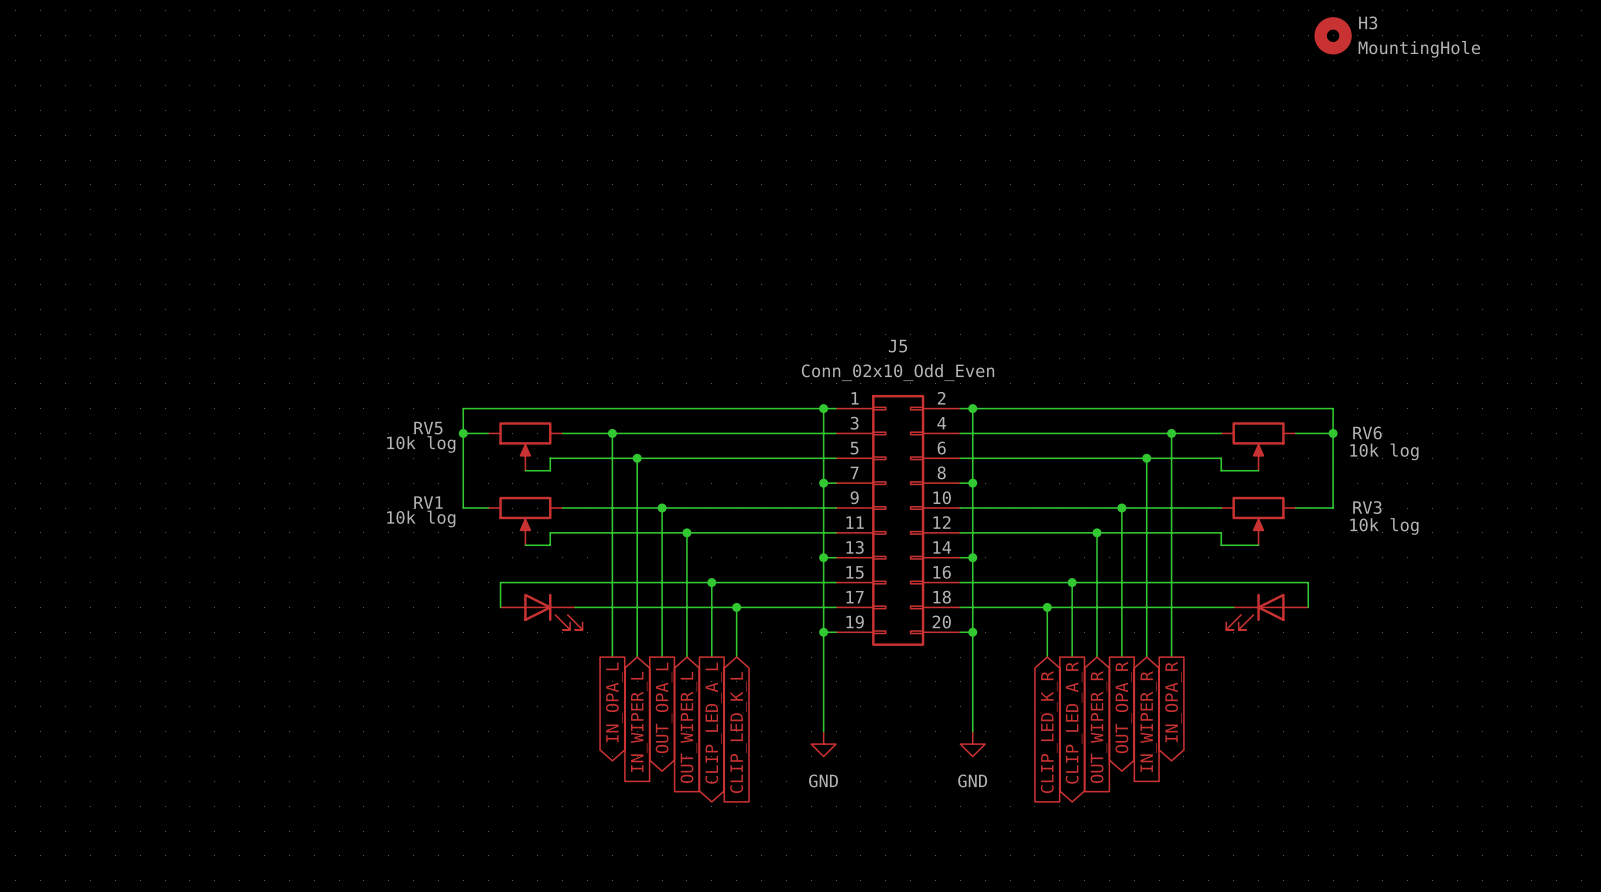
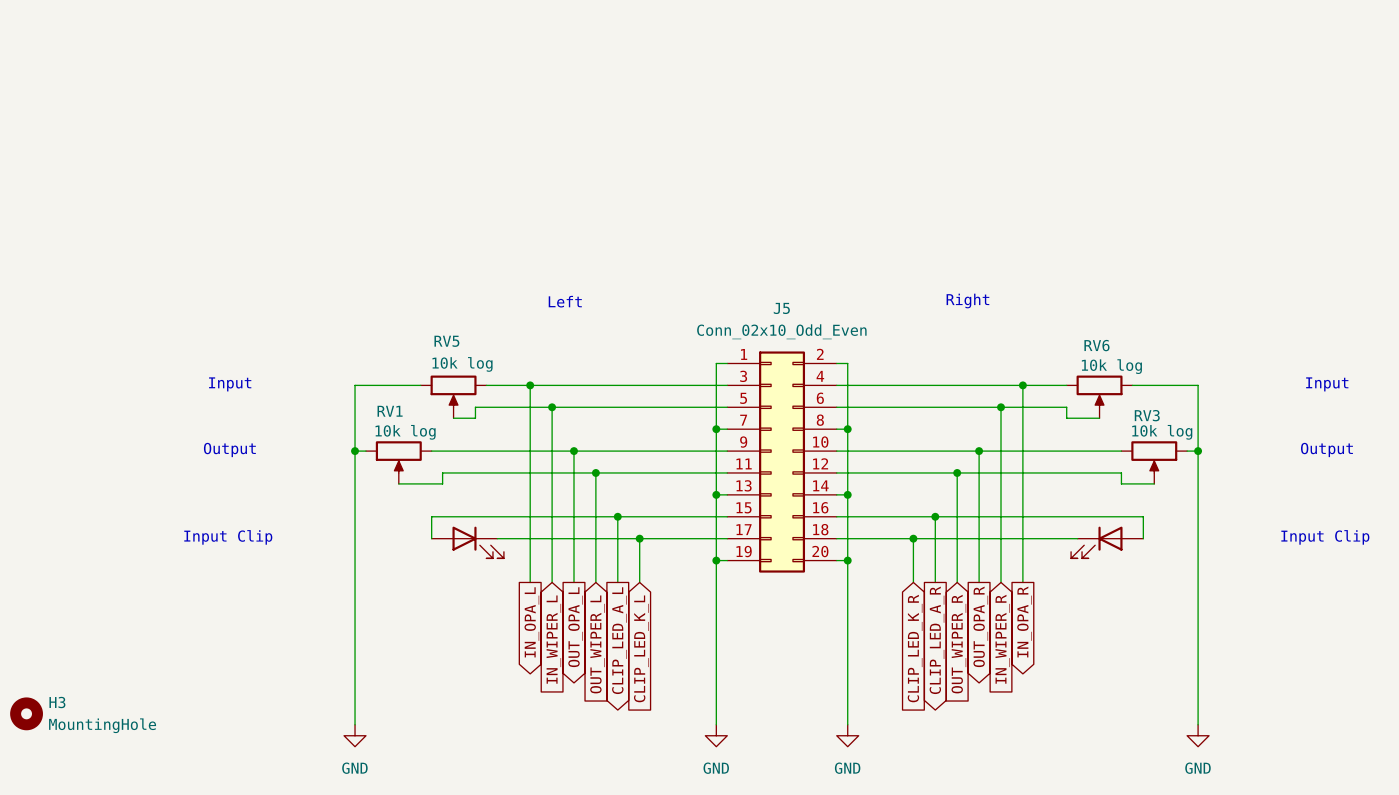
H3 position: (1333, 35) -> (26, 713)
text: none -> Right (967, 300)
text: none -> Left (565, 301)
wire: (823, 408) (463, 408) (463, 508) (488, 508) -> none
junction: (823, 408) -> none
wire: (972, 408) (1333, 408) (1333, 508) (1295, 508) -> none
junction: (972, 408) -> none
RV5 name position: RV5 (428, 428) -> RV5 (446, 341)
text: none -> Input (230, 384)
RV6 name position: RV6 (1367, 432) -> RV6 (1096, 345)
text: none -> Input (1327, 384)
wire: none -> (398, 385) (355, 385) (355, 724)
junction: (463, 433) -> none
wire: none -> (1165, 385) (1198, 385) (1198, 724)
junction: (1333, 433) -> none
RV5 value position: 10k log (421, 444) -> 10k log (462, 364)
RV6 value position: 10k log (1384, 451) -> 10k log (1111, 366)
RV1 name position: RV1 (428, 502) -> RV1 (390, 411)
text: none -> Output (229, 449)
text: none -> Output (1326, 449)
RV3 name position: RV3 (1367, 507) -> RV3 (1147, 415)
wire: none -> (355, 451) (365, 451)
junction: none -> (355, 451)
wire: none -> (431, 451) (486, 451)
wire: none -> (1066, 451) (1121, 451)
wire: none -> (1187, 451) (1198, 451)
junction: none -> (1198, 451)
RV1 value position: 10k log (421, 519) -> 10k log (405, 432)
RV1 position: (525, 521) -> (398, 462)
RV3 position: (1258, 521) -> (1154, 462)
RV3 value position: 10k log (1384, 526) -> 10k log (1162, 432)
wire: (550, 532) (550, 545) (525, 545) -> (475, 472) (442, 472) (442, 483) (398, 483)
wire: (1221, 532) (1221, 545) (1258, 545) -> (1066, 472) (1121, 472) (1121, 483) (1154, 483)
text: none -> Input Clip (228, 537)
text: none -> Input Clip (1325, 537)
wire: none -> (716, 648) (716, 724)
wire: none -> (847, 648) (847, 724)
power symbol: GND (823, 744) -> none
power symbol: GND (972, 744) -> none
power symbol: none -> GND (355, 735)
power symbol: none -> GND (716, 735)
power symbol: none -> GND (847, 735)
power symbol: none -> GND (1198, 735)

